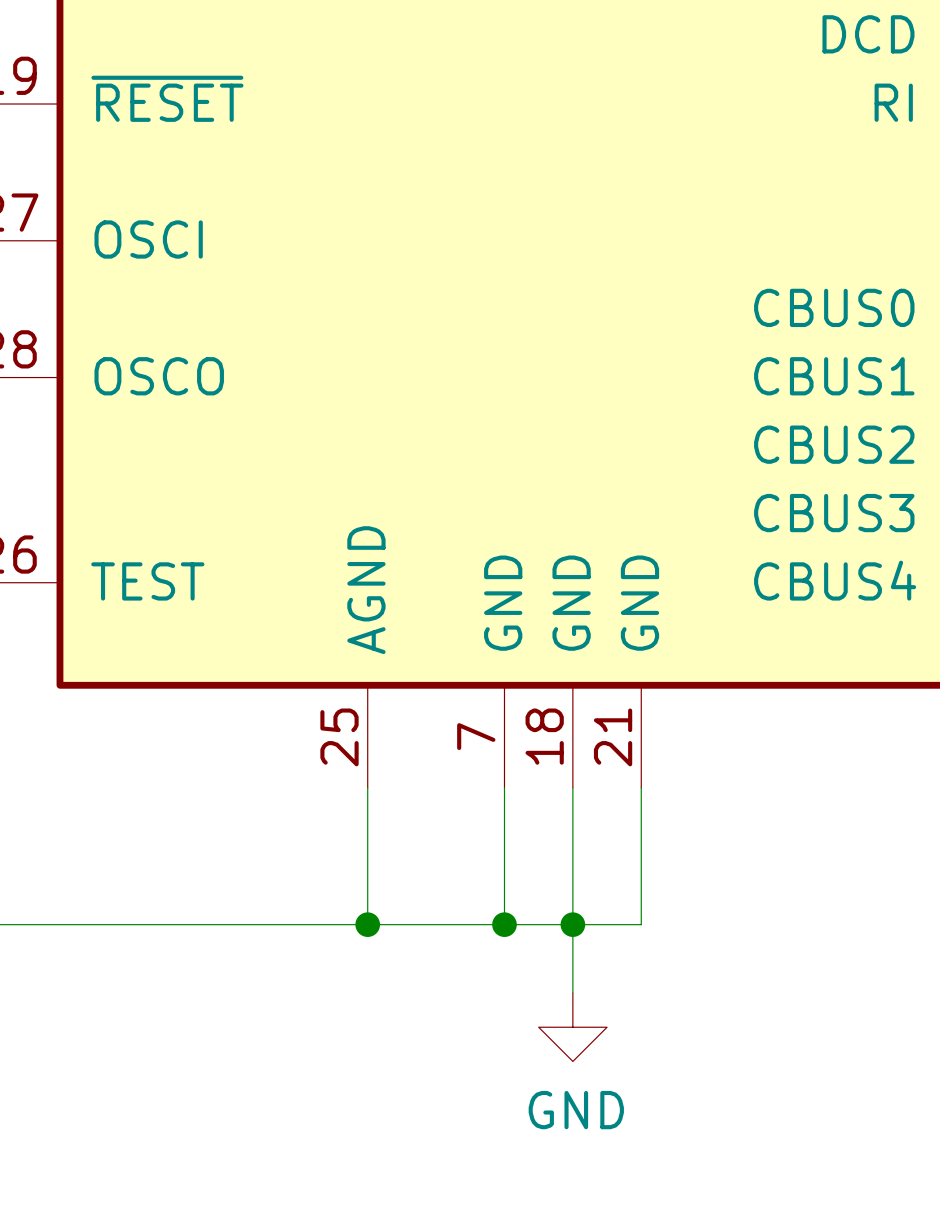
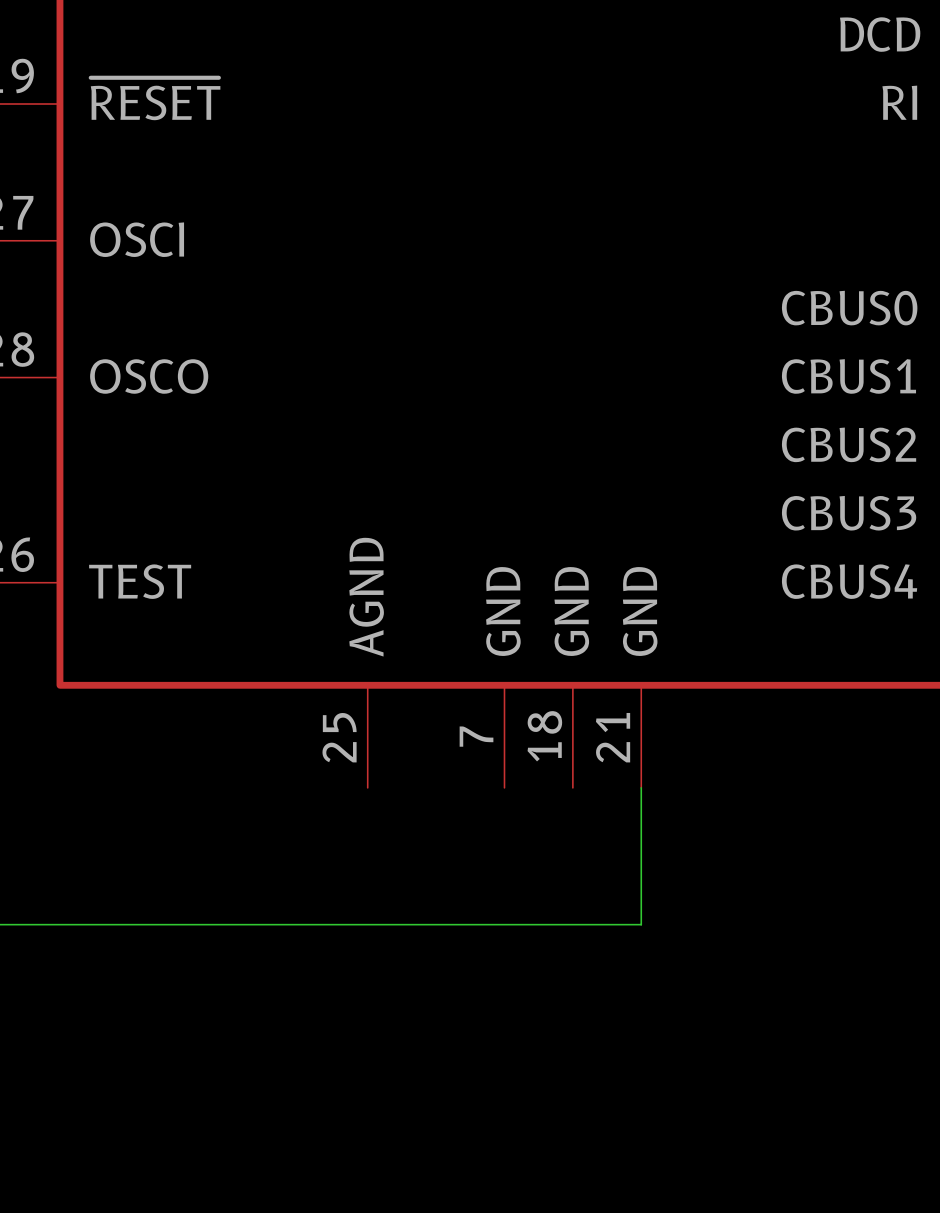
wire: (367, 787) (367, 924) -> none
wire: (504, 787) (504, 924) -> none
wire: (572, 787) (572, 993) -> none
junction: (367, 924) -> none
junction: (504, 924) -> none
junction: (572, 924) -> none
power symbol: GND (572, 1027) -> none

